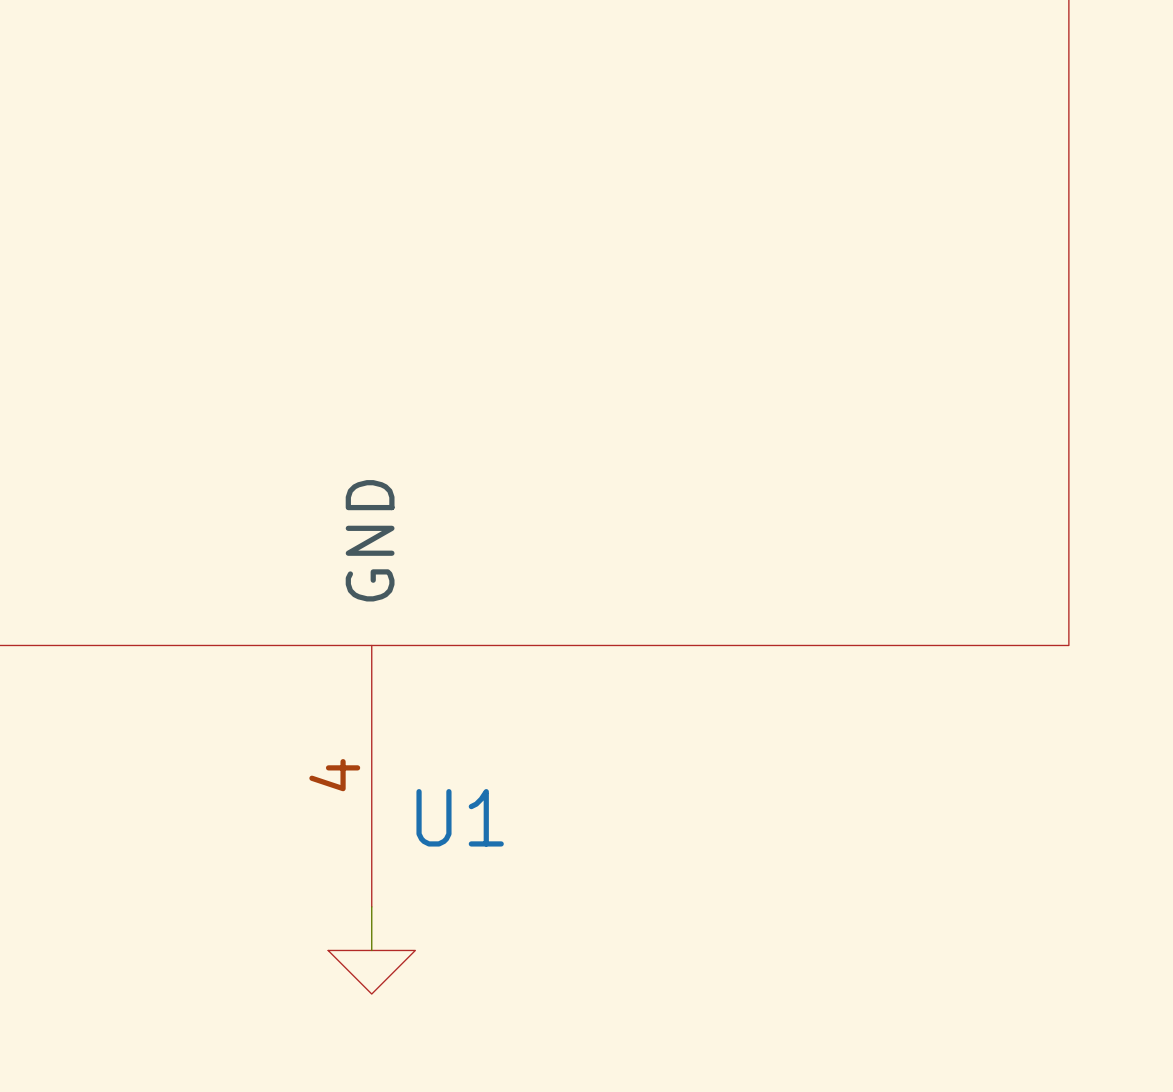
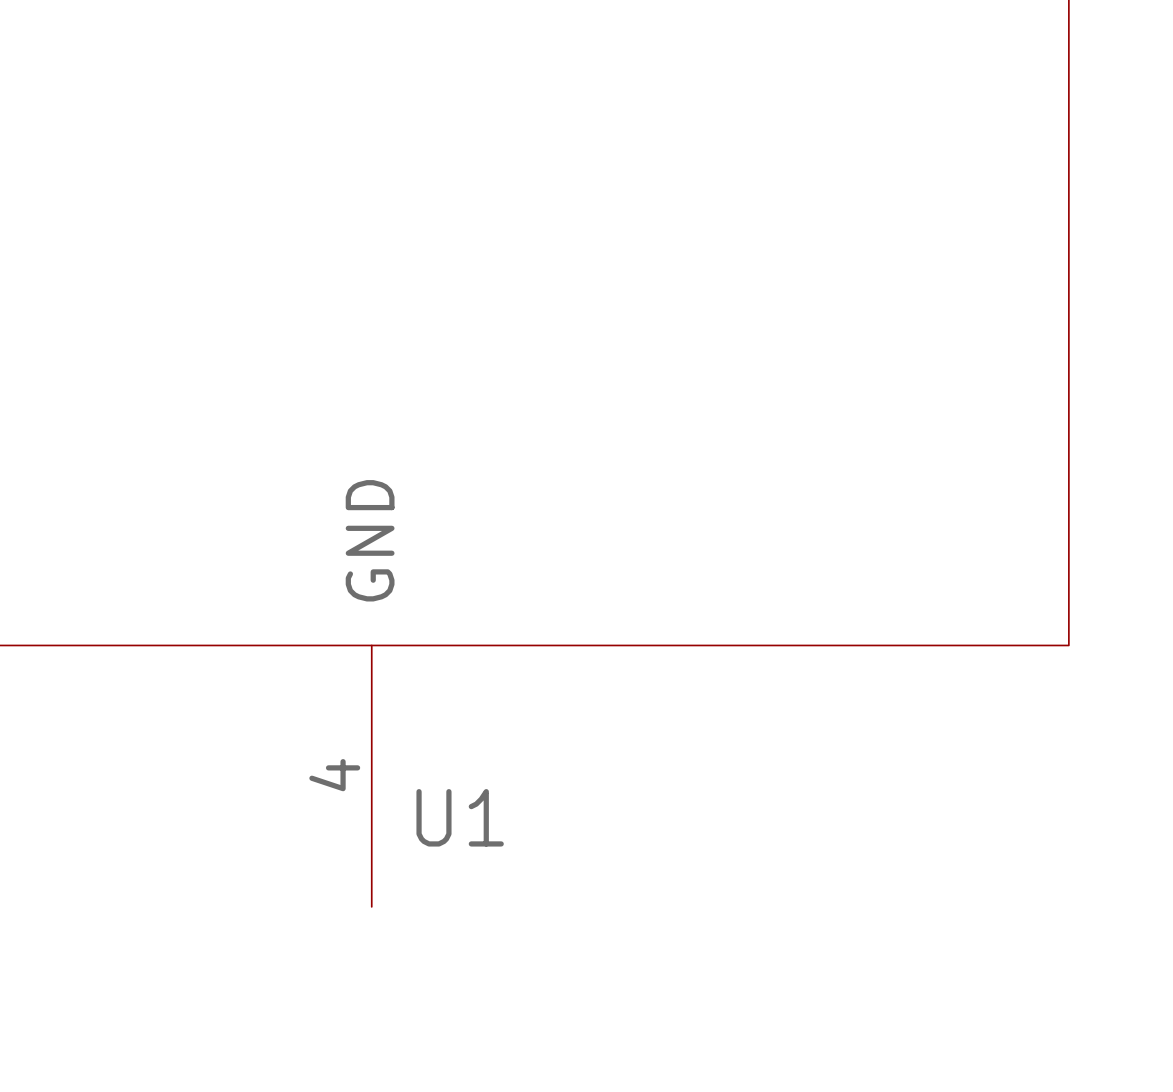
wire: (371, 906) (371, 950) -> none
power symbol: (371, 972) -> none

